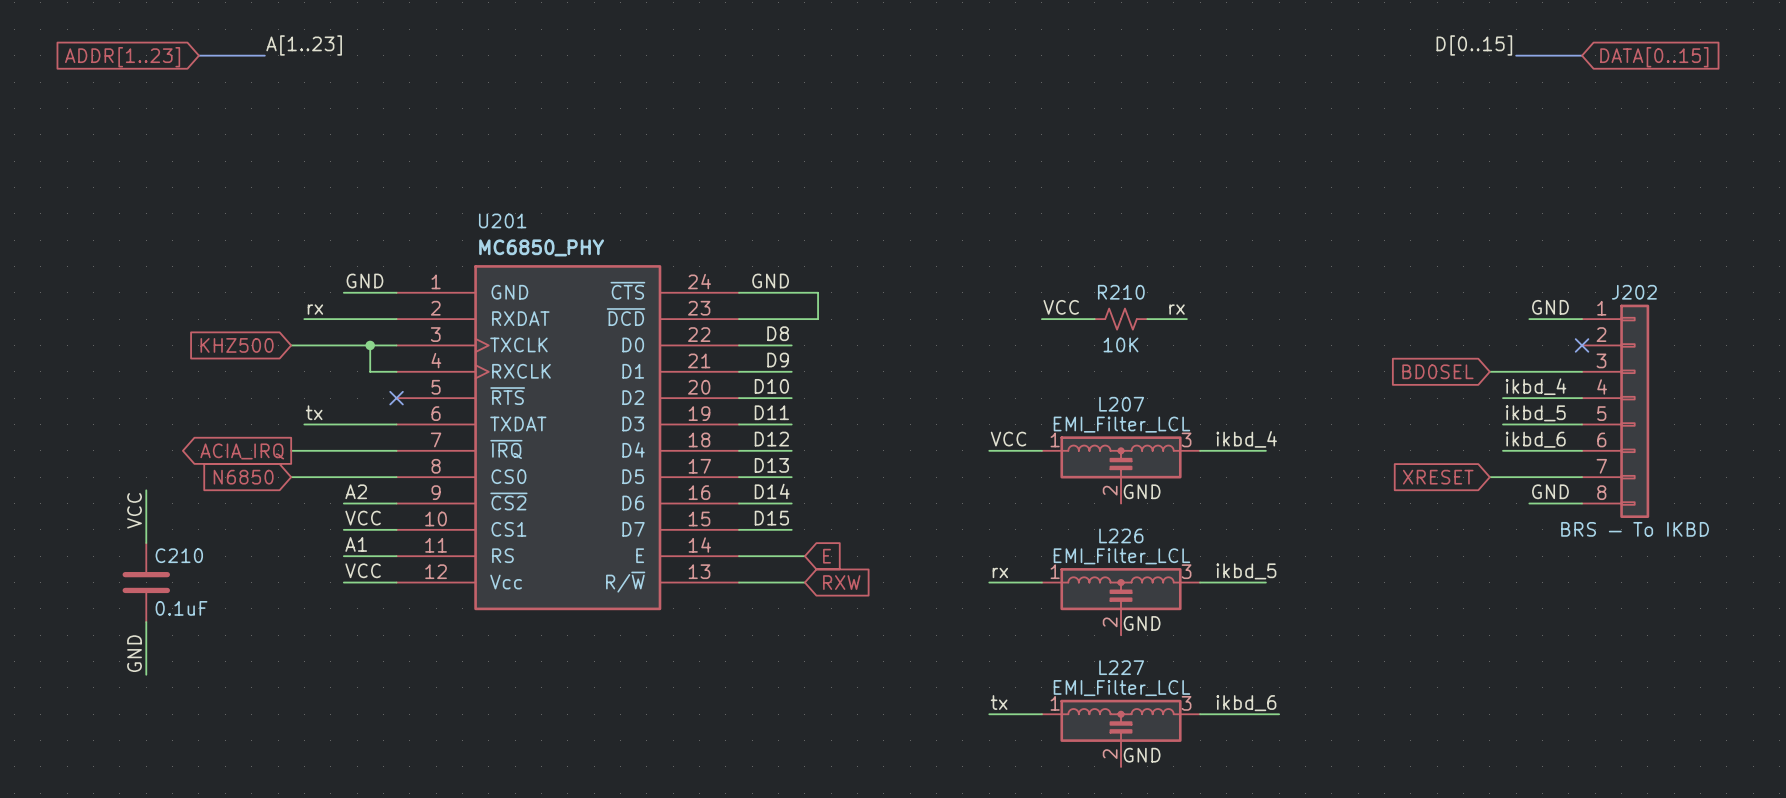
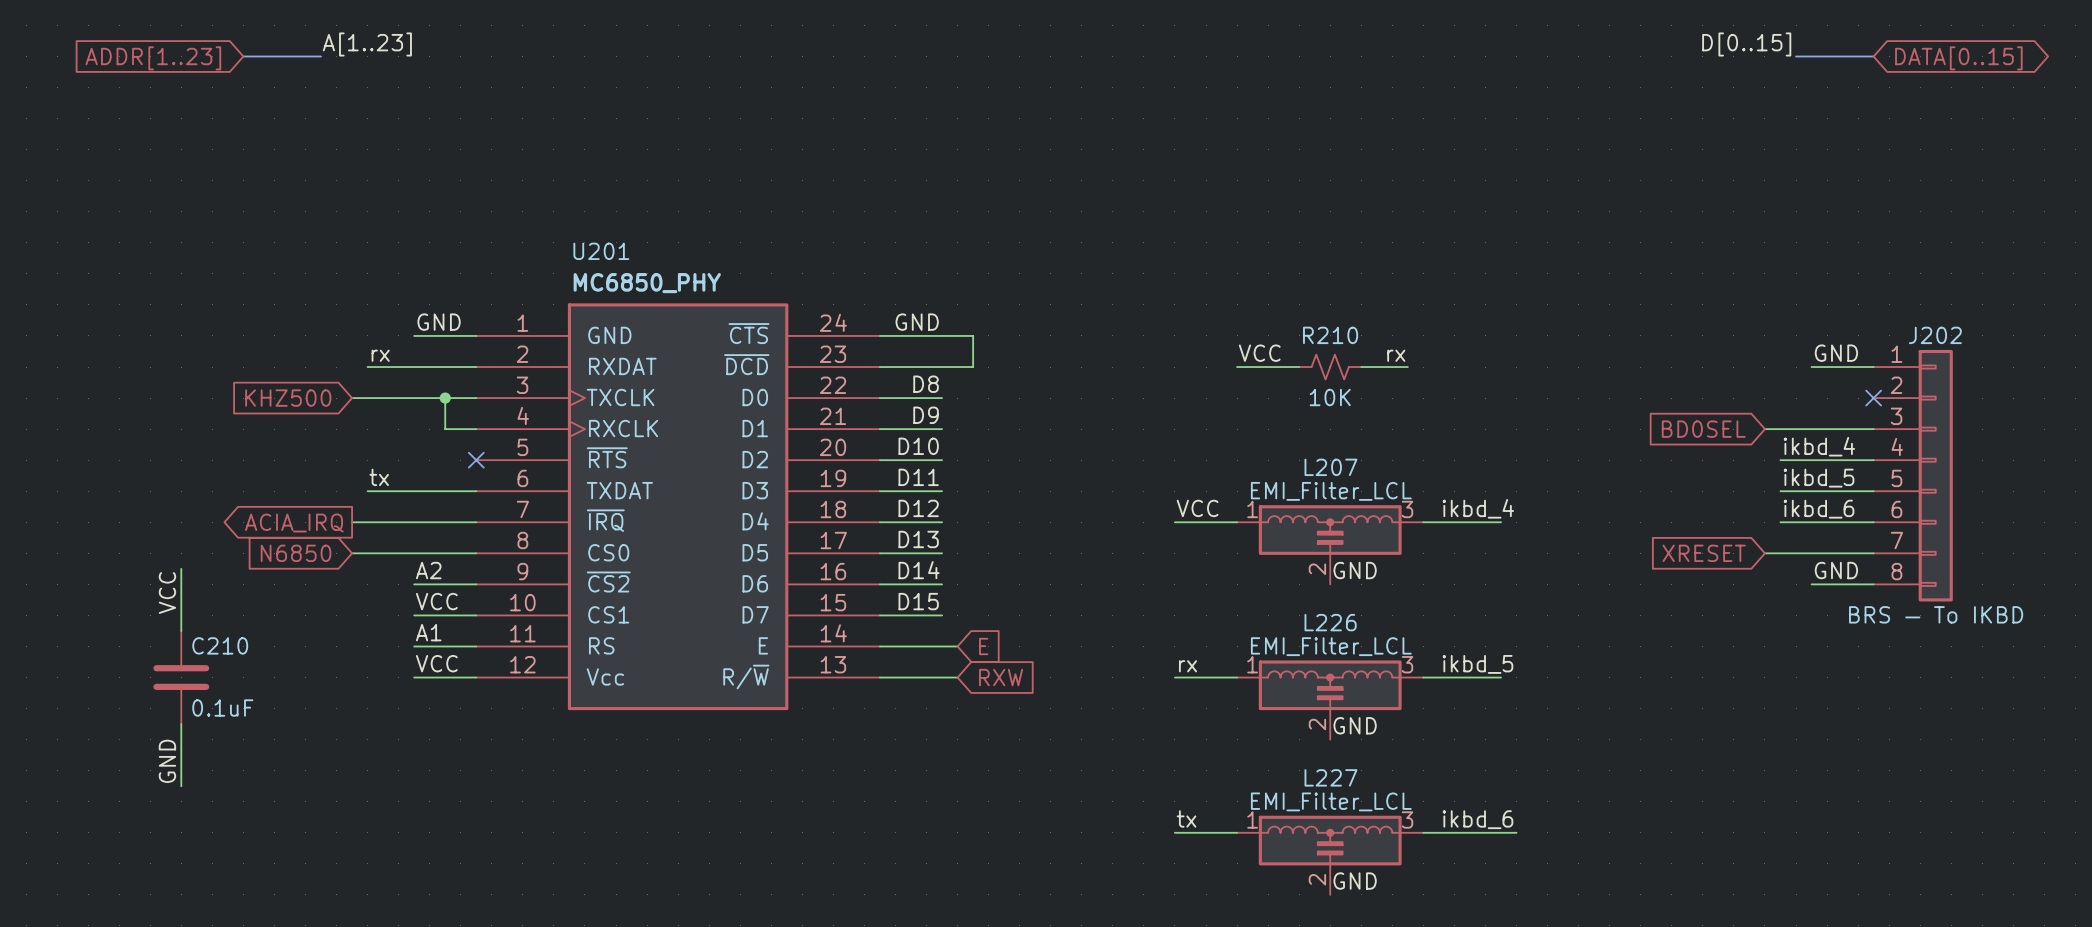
global label shape: input (1654, 57) -> bidirectional (1958, 58)

